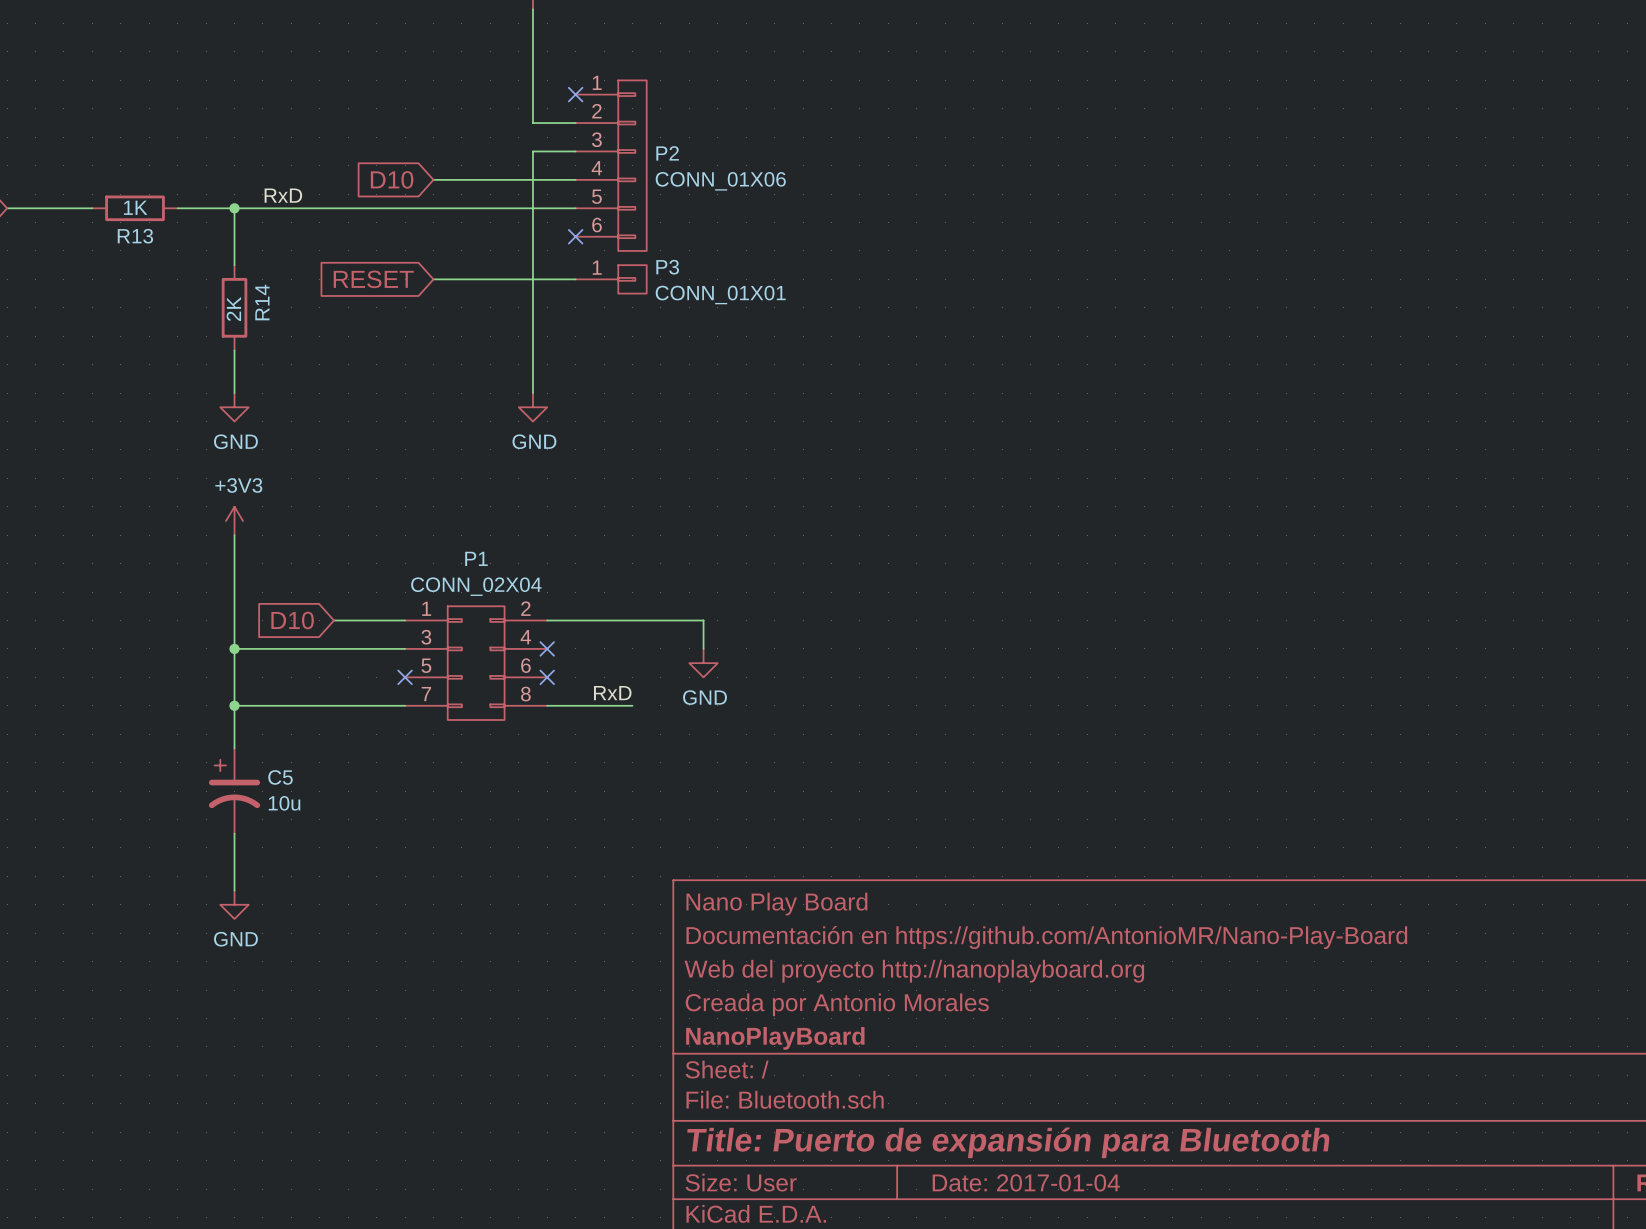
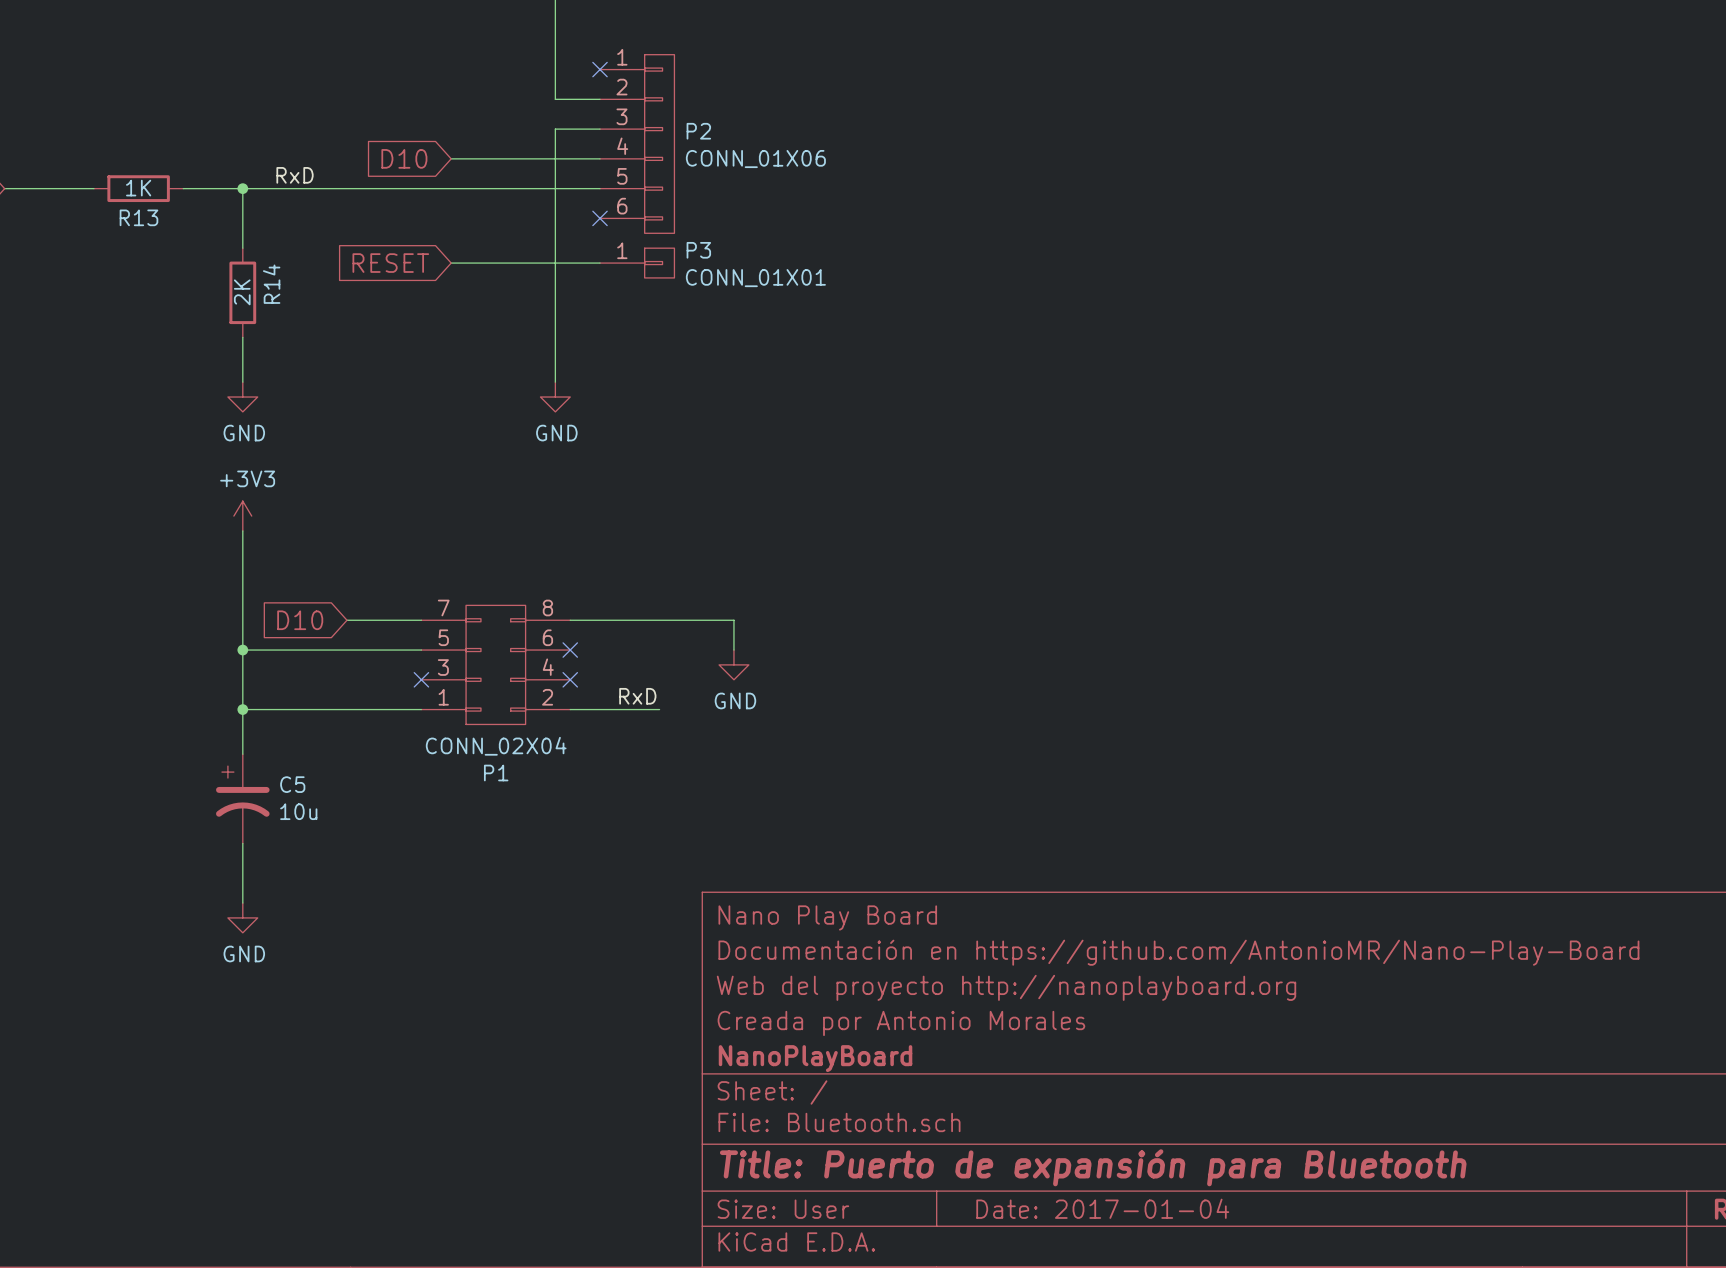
P1 flip: as is (476, 663) -> up-down (495, 664)

